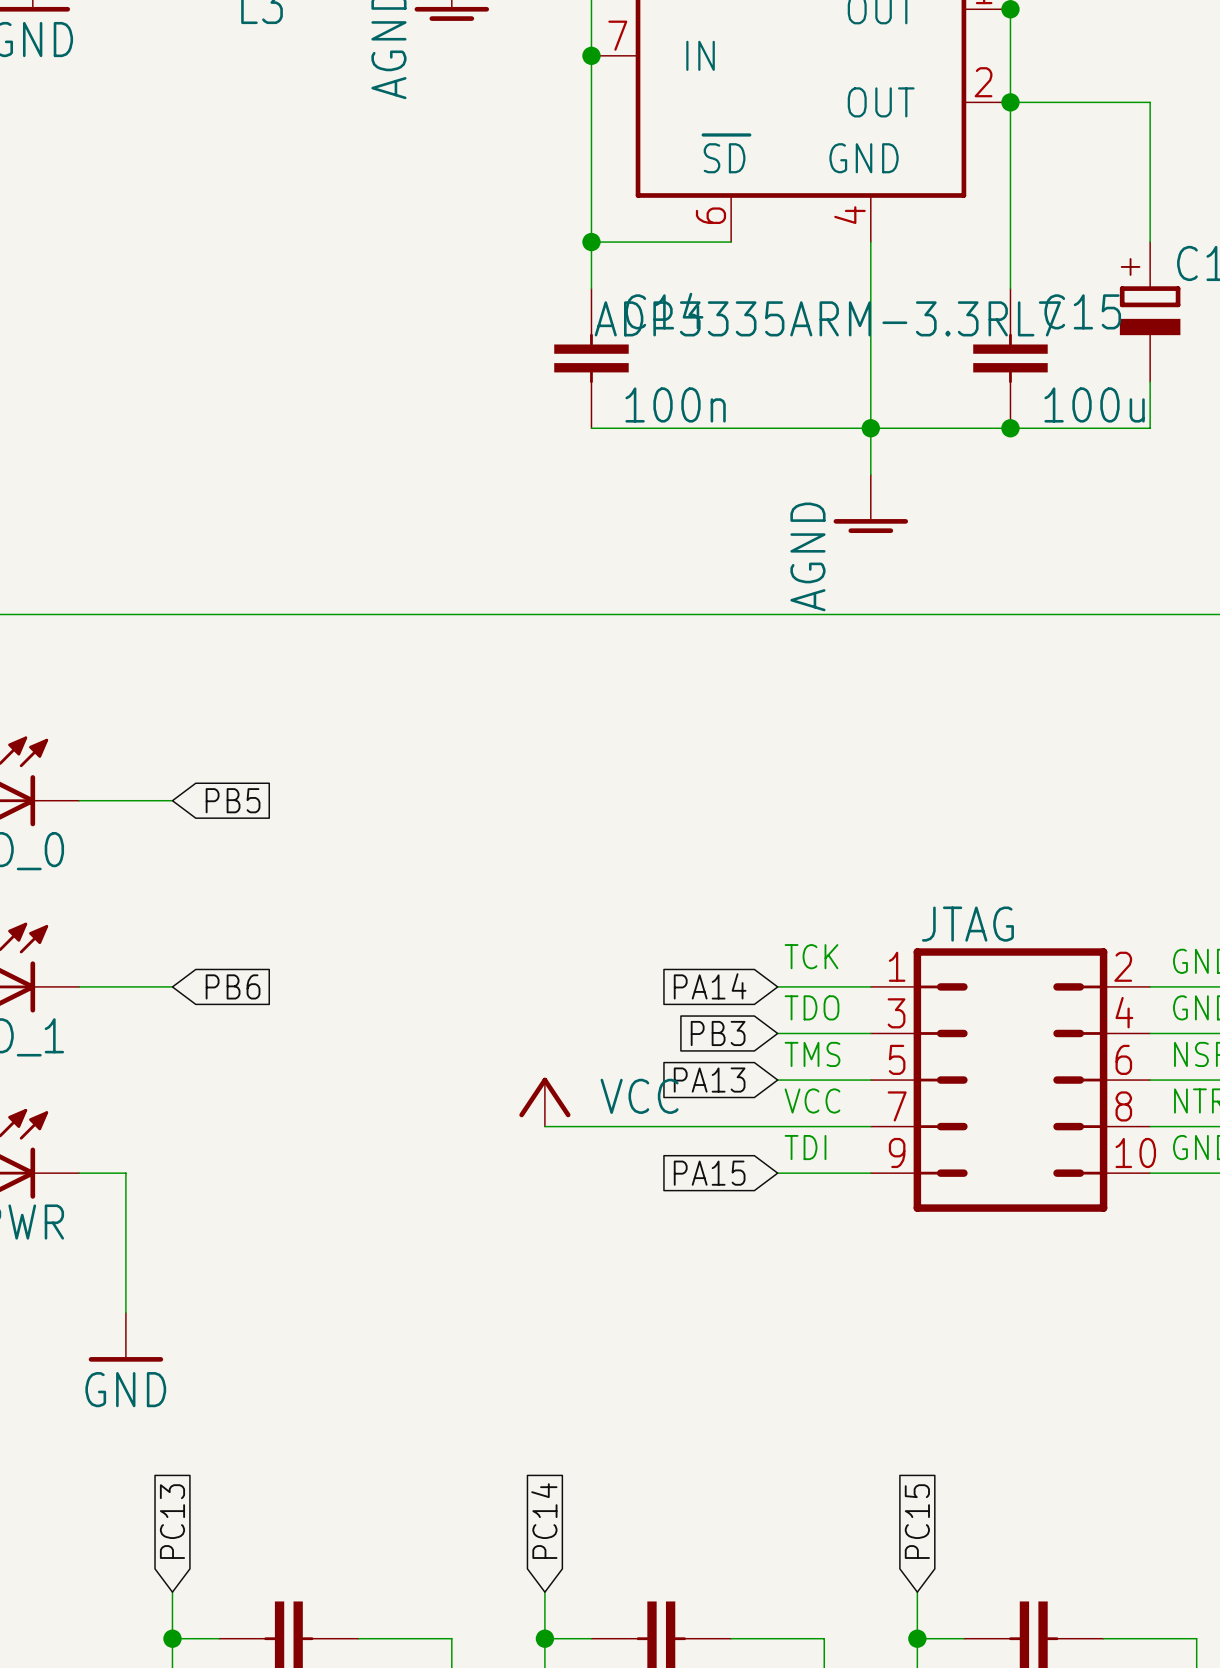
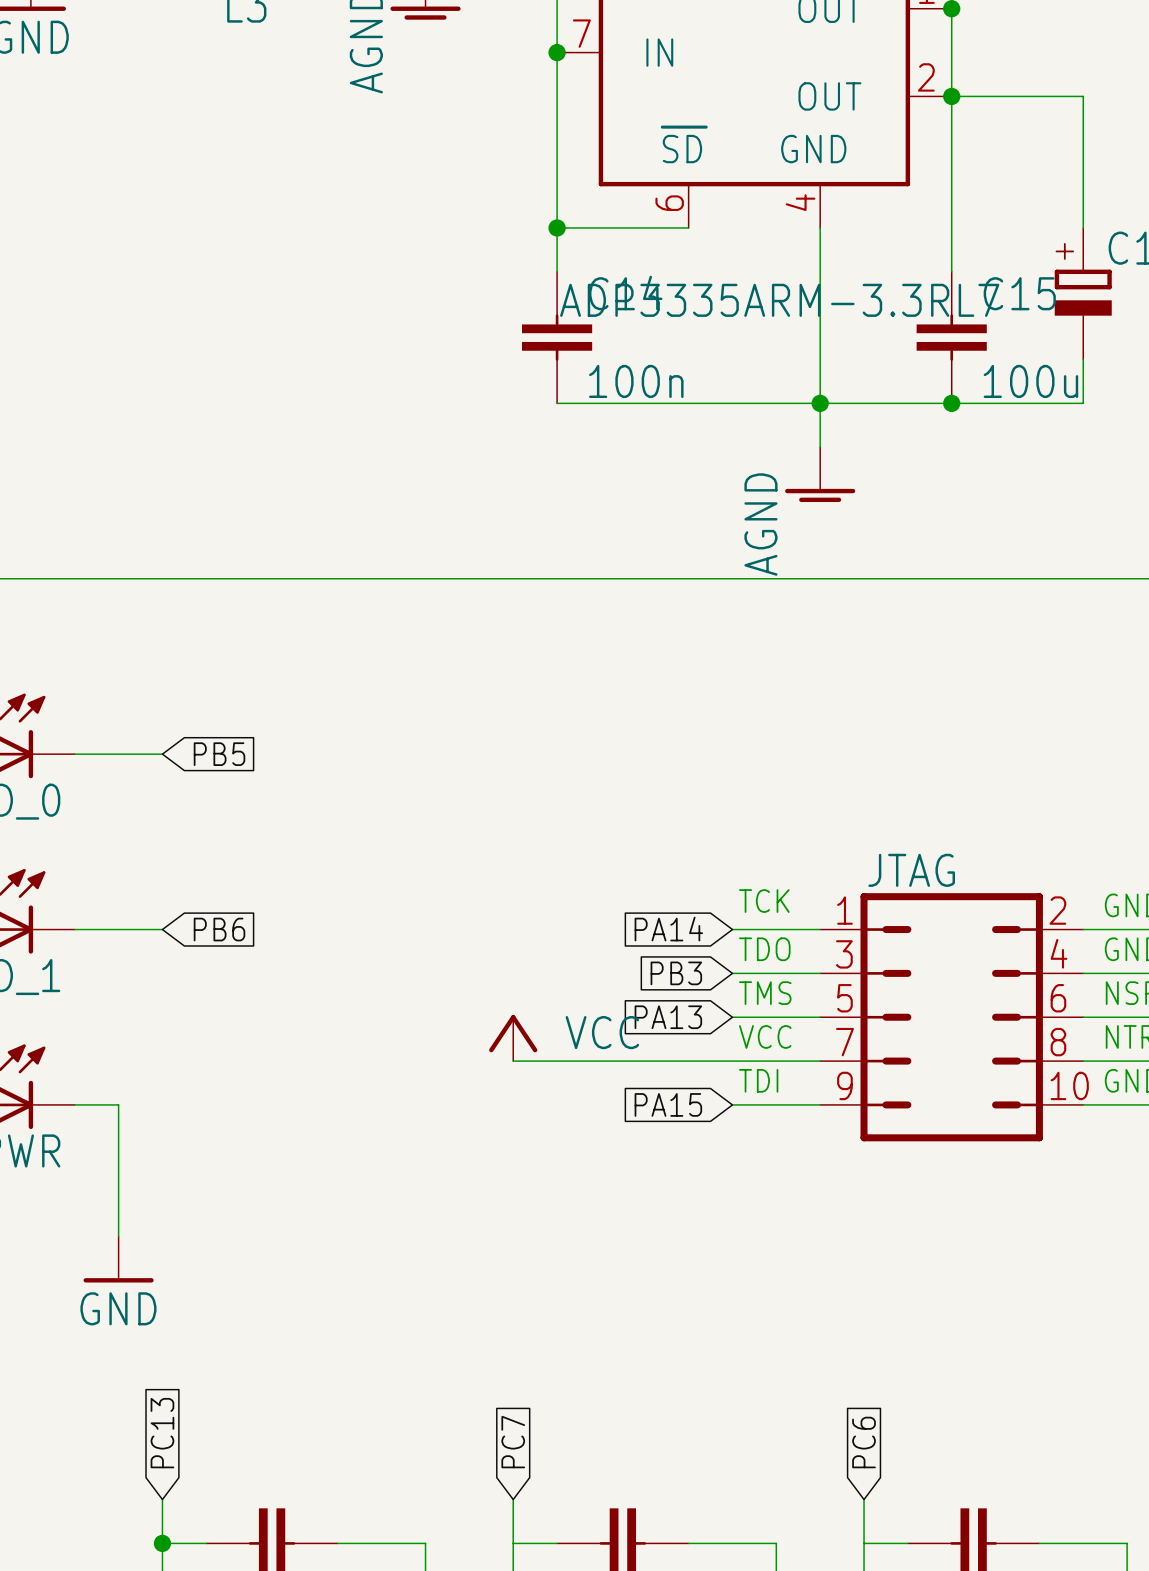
global label: PC14 (544, 1521) -> PC7 (513, 1442)
global label: PC15 (917, 1521) -> PC6 (864, 1442)
junction: (544, 1638) -> none
junction: (917, 1638) -> none

